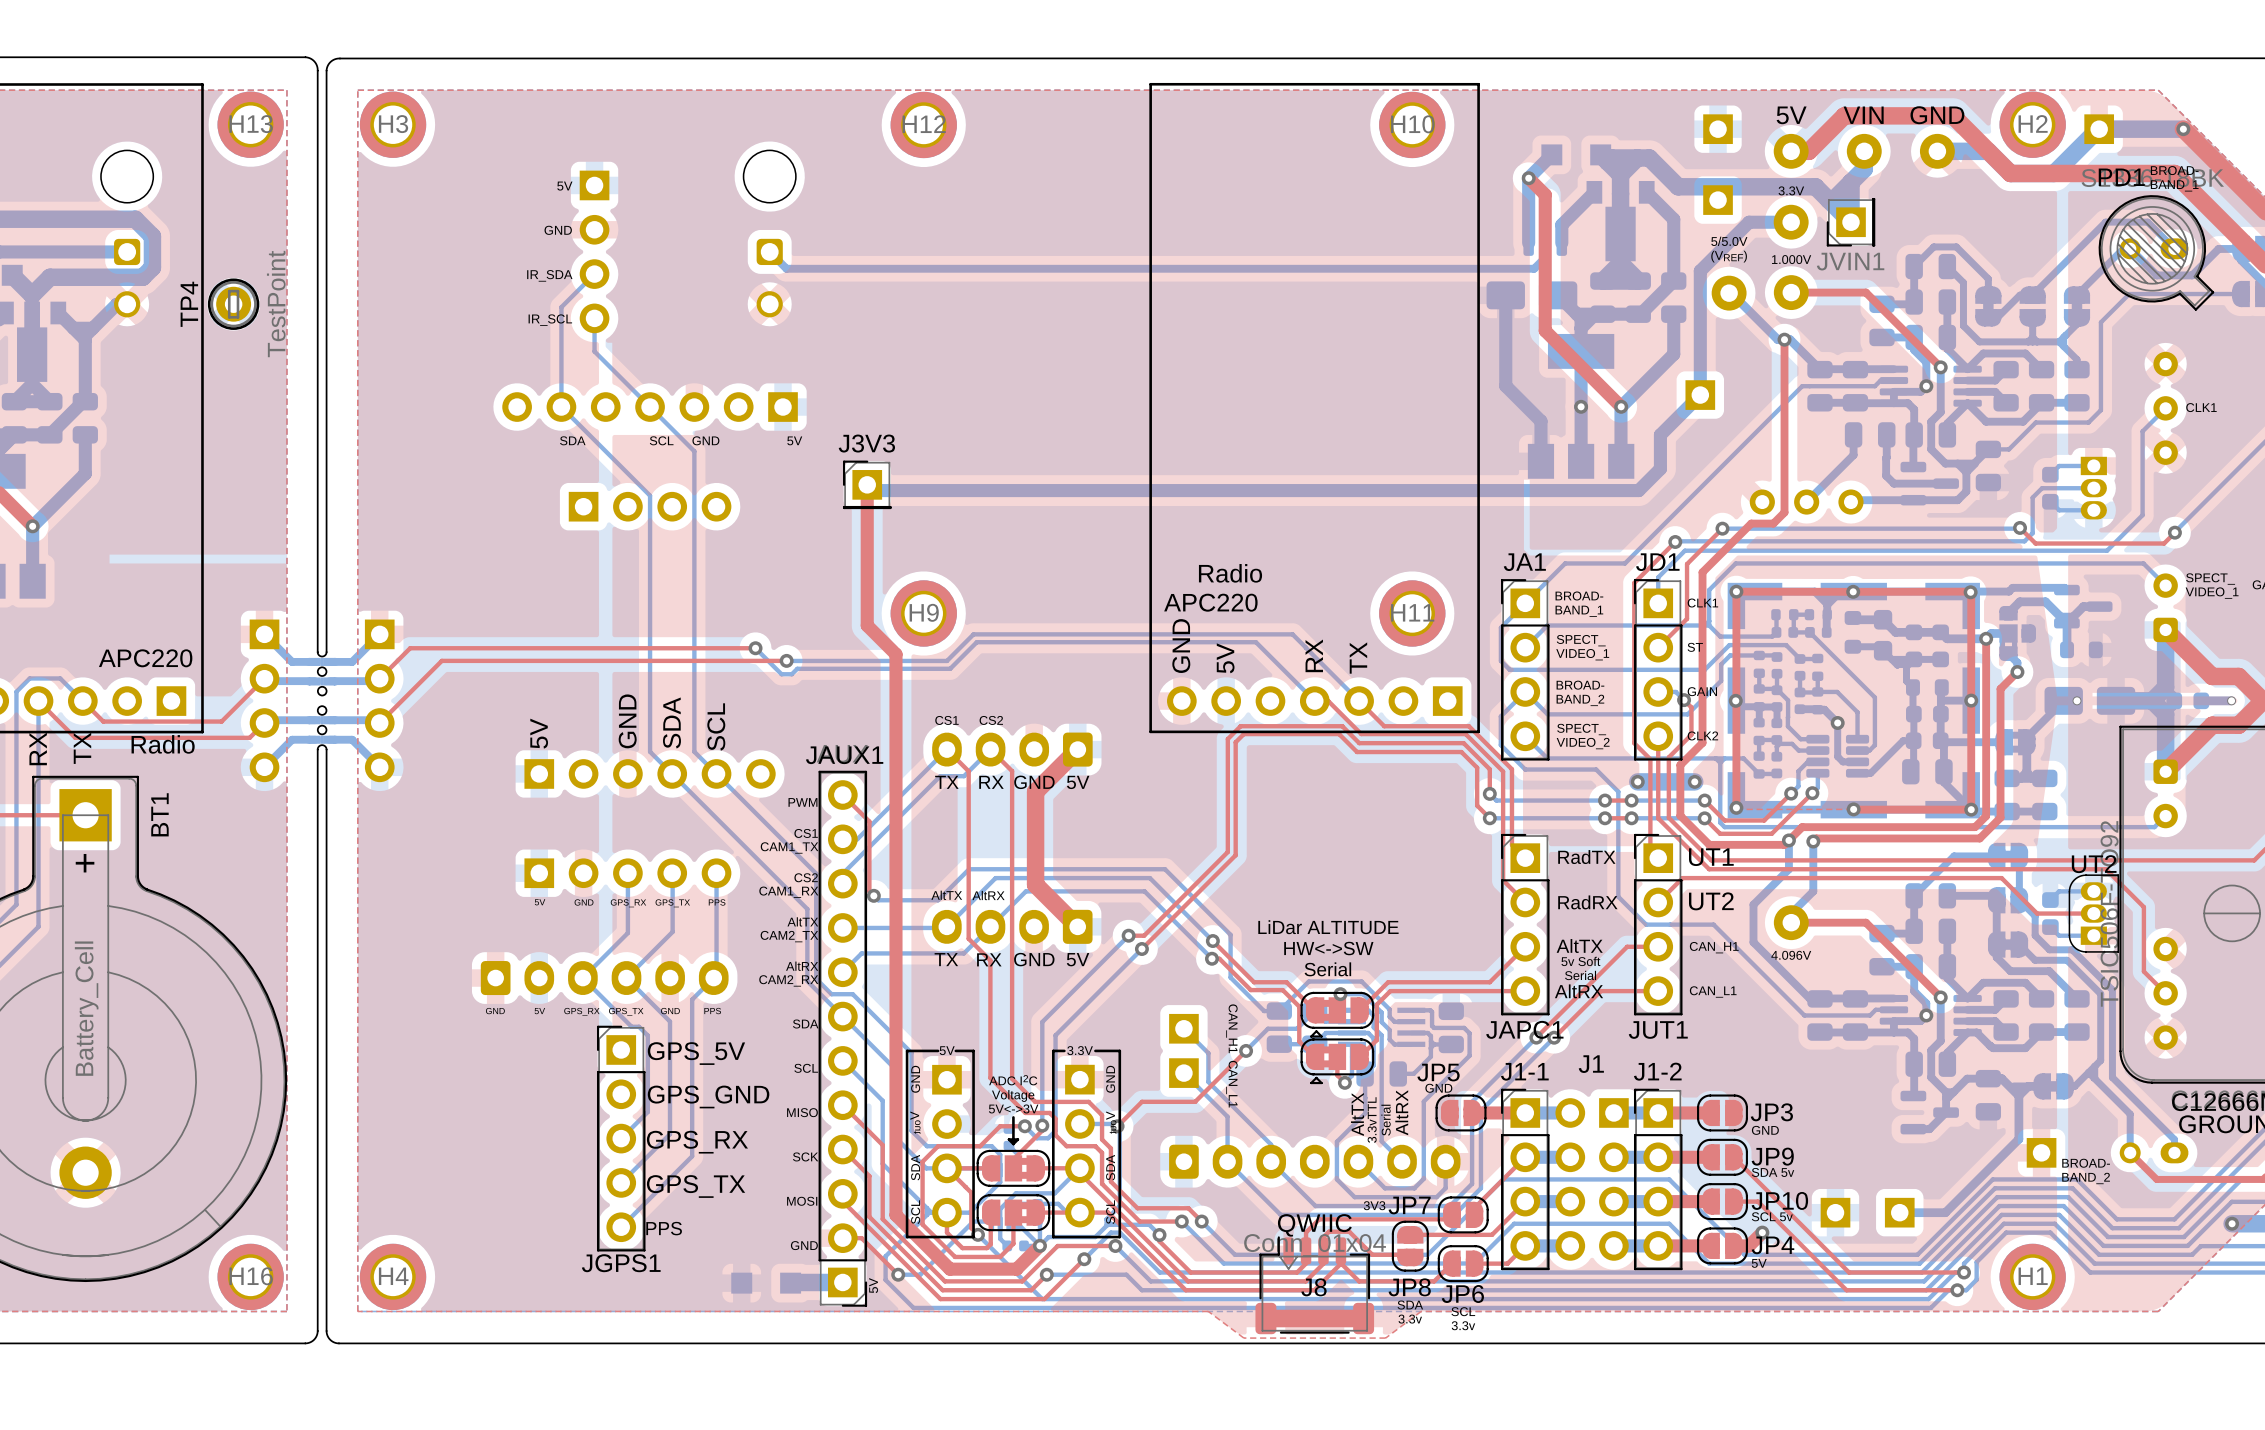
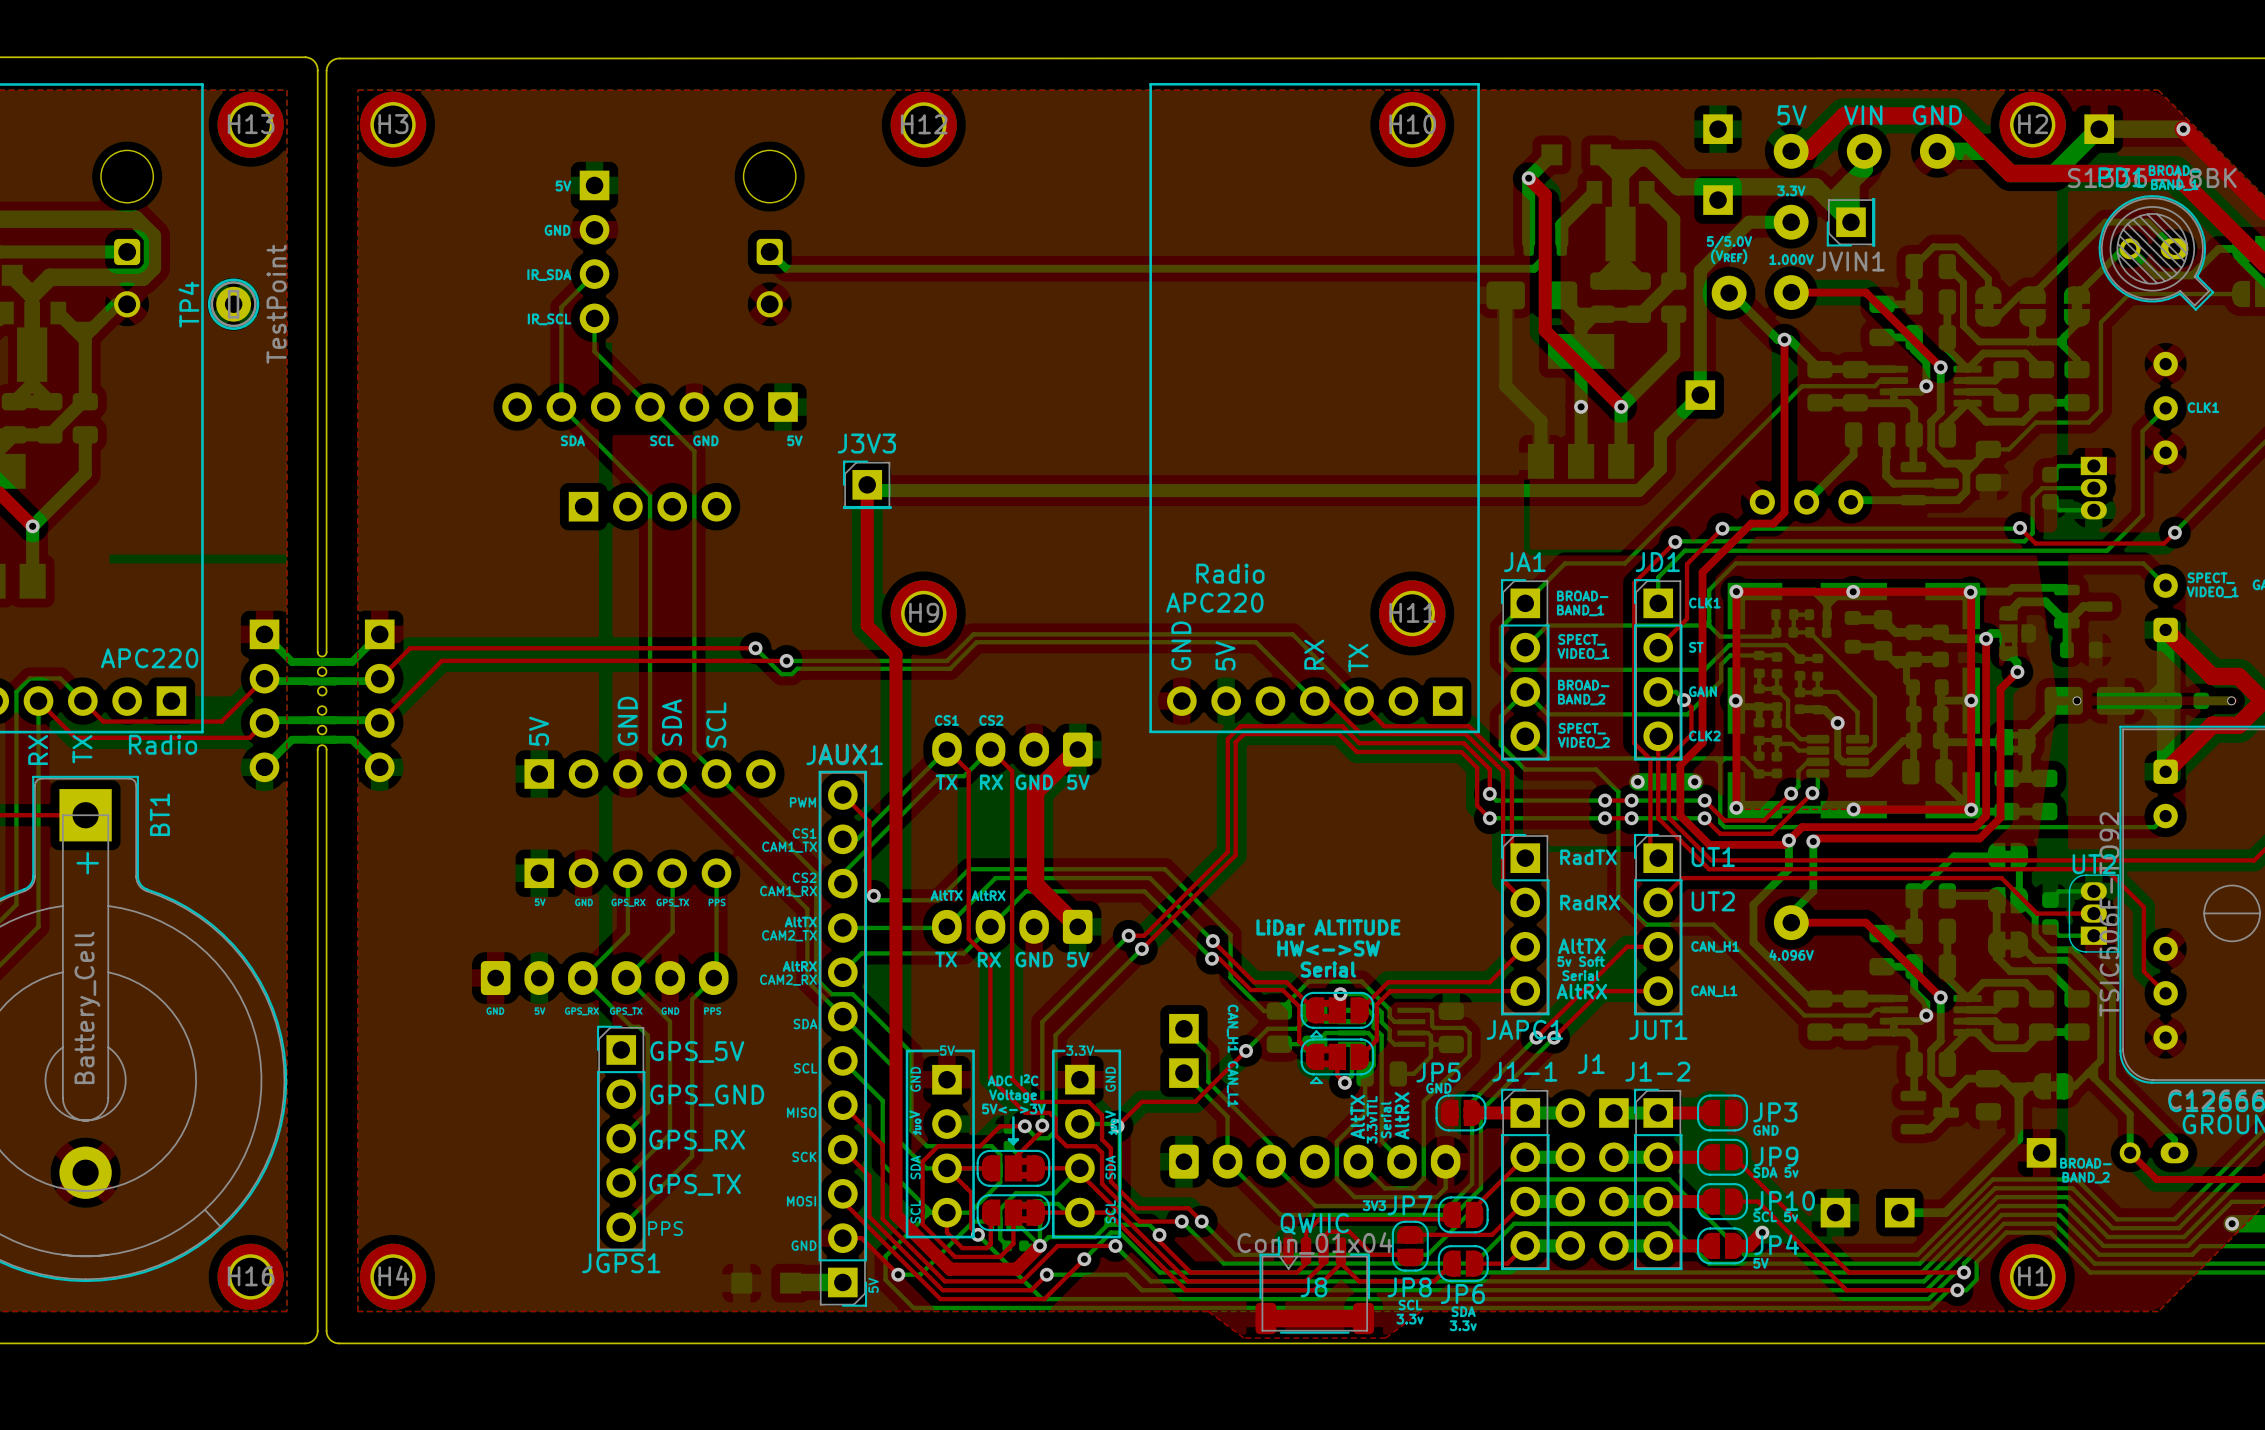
text: SDA (1410, 1305) -> SCL (1410, 1305)
text: SCL (1463, 1311) -> SDA (1463, 1311)

